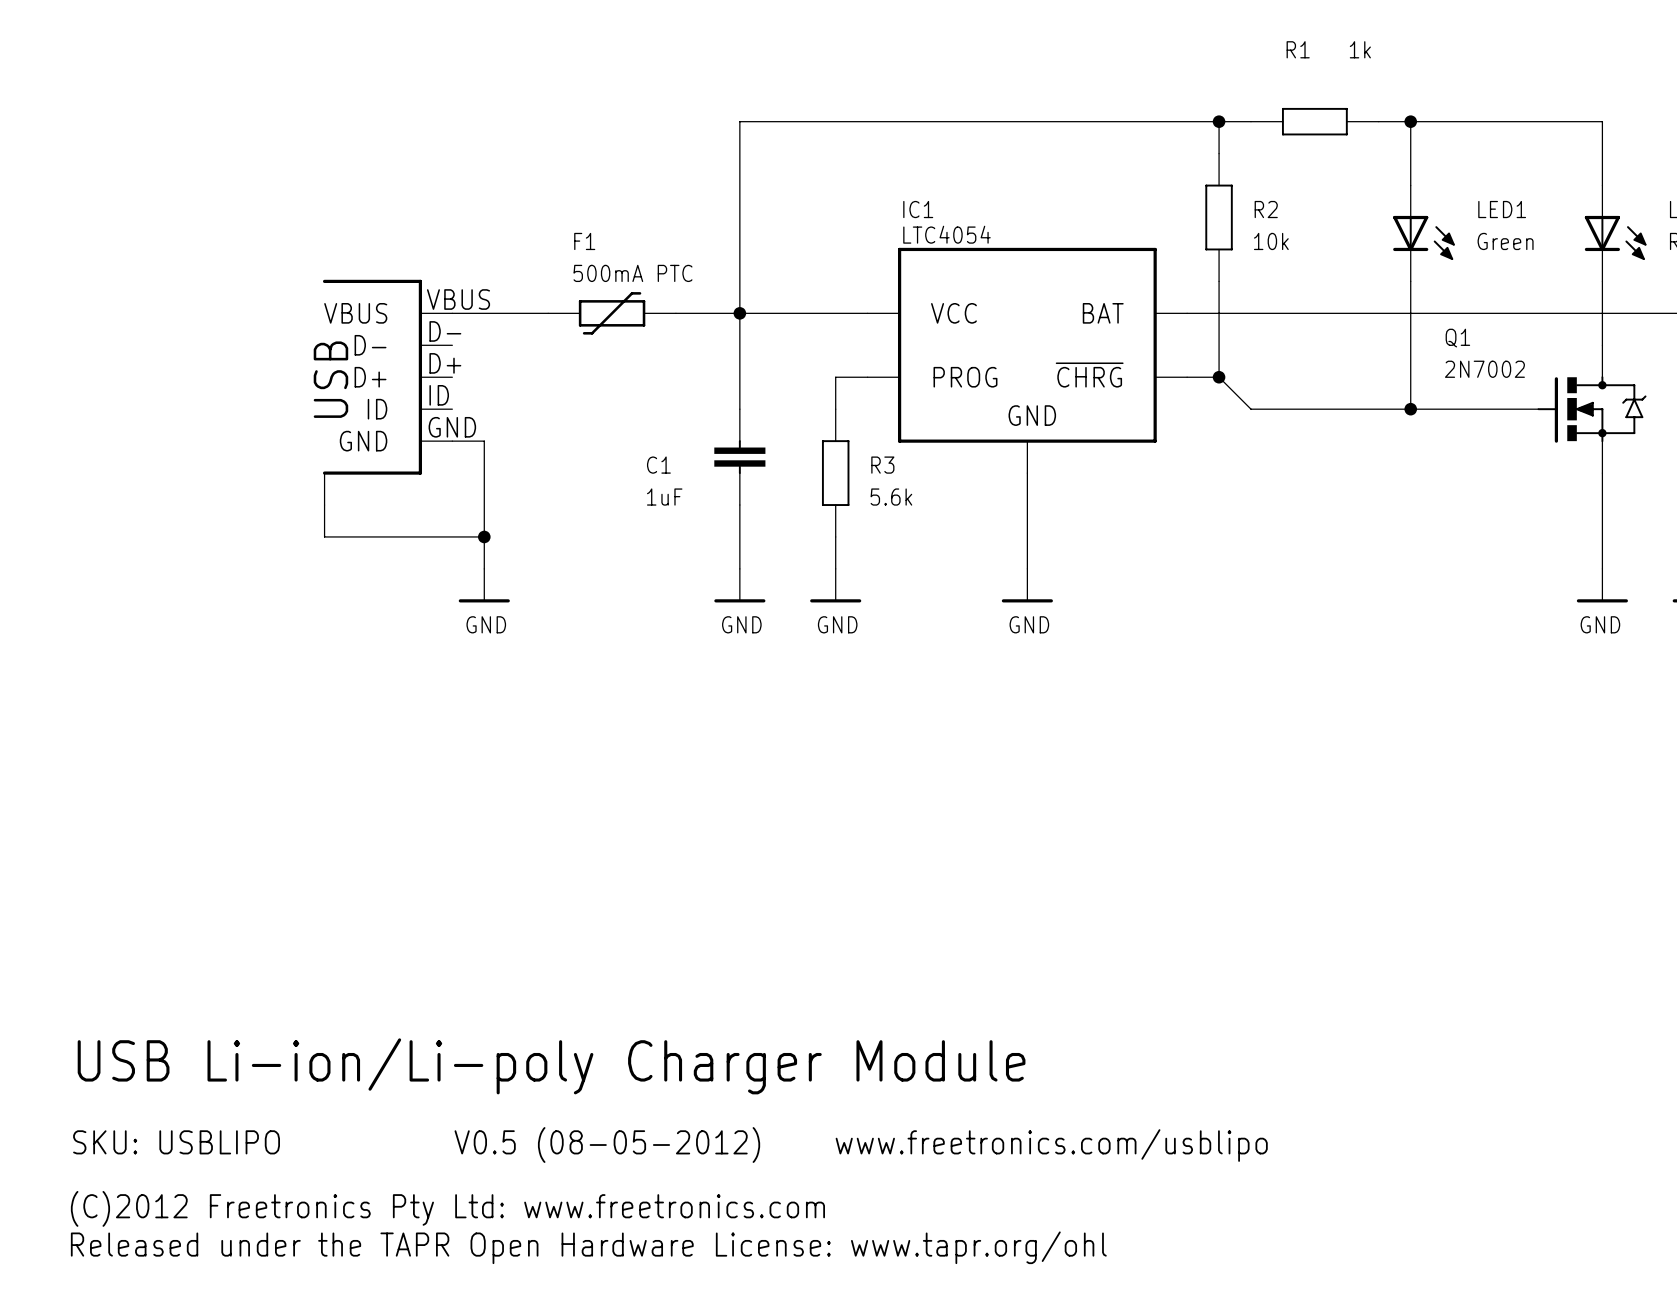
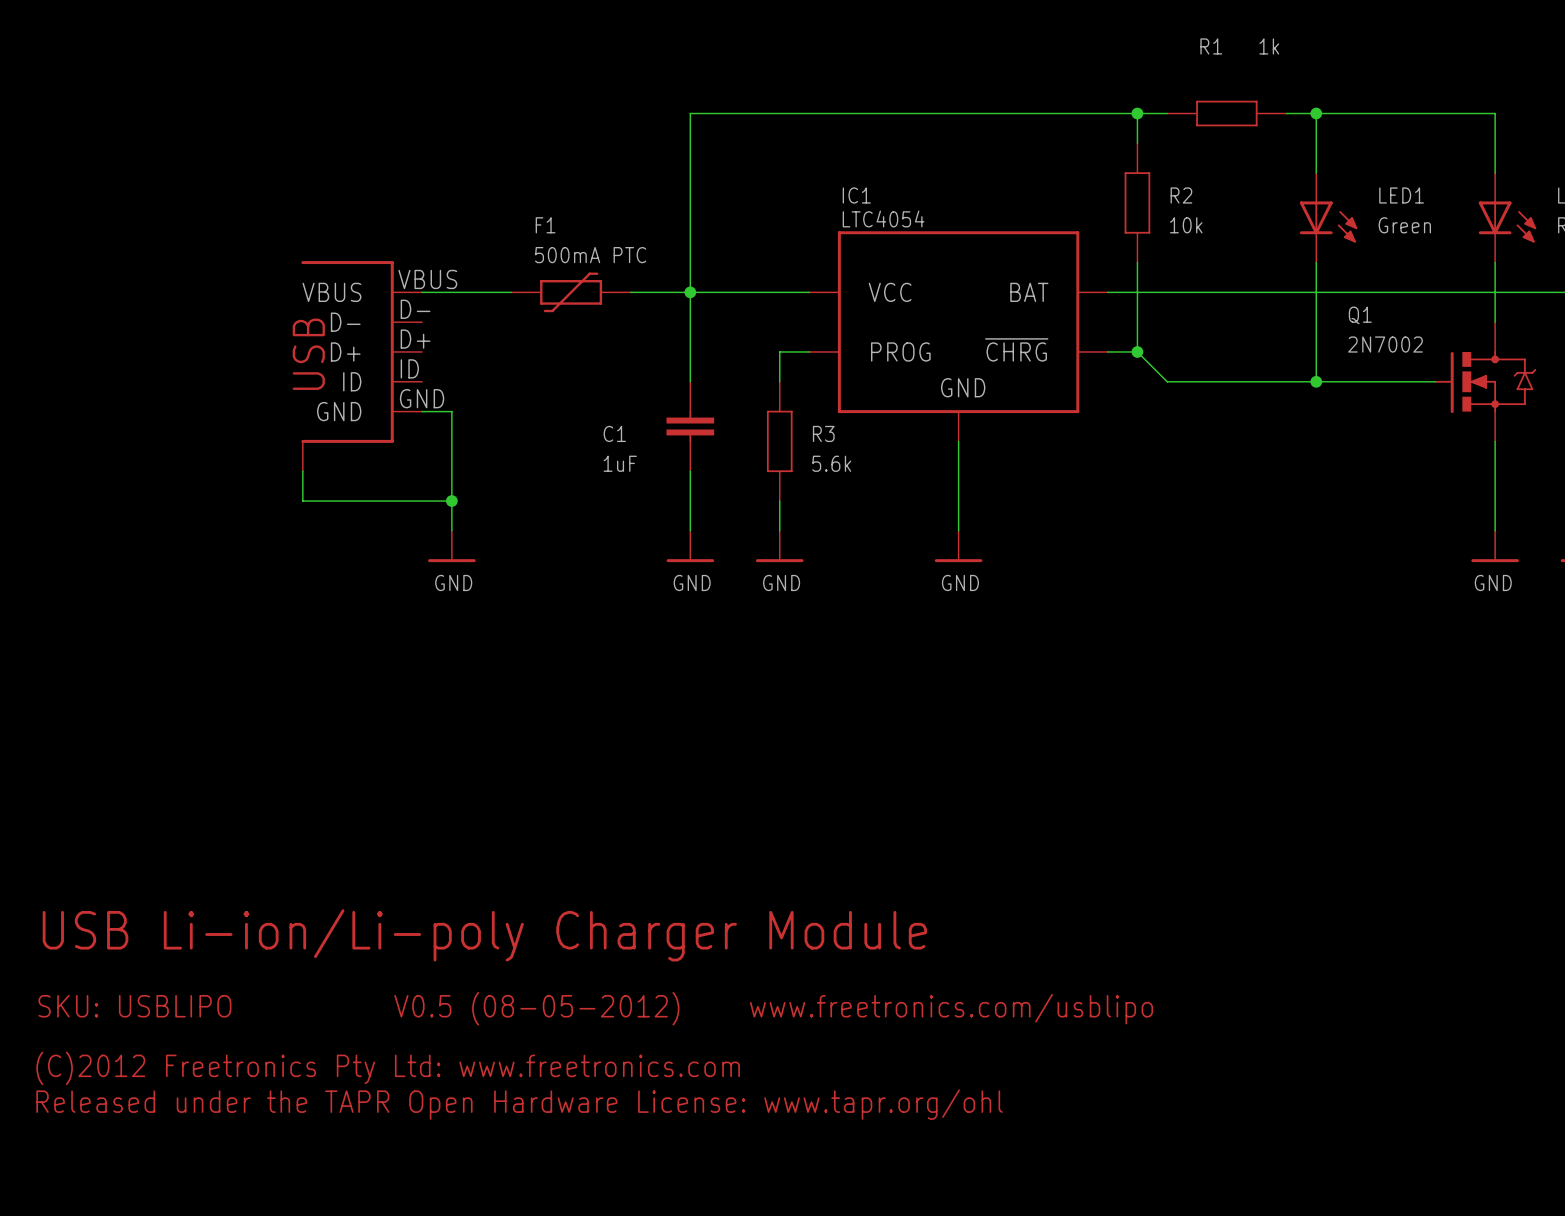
text position: USB Li-ion/Li-poly Charger Module (551, 1066) -> USB Li-ion/Li-poly Charger Module (484, 935)
text position: SKU: USBLIPO (176, 1142) -> SKU: USBLIPO (134, 1006)
text position: V0.5 (08-05-2012) (607, 1145) -> V0.5 (08-05-2012) (536, 1008)
text position: www.freetronics.com/usblipo (1051, 1145) -> www.freetronics.com/usblipo (951, 1009)
text position: (C)2012 Freetronics Pty Ltd: www.freetronics.com (447, 1208) -> (C)2012 Freetronics Pty Ltd: www.freetronics.com (388, 1068)
text position: Released under the TAPR Open Hardware License: www.tapr.org/ohl (588, 1247) -> Released under the TAPR Open Hardware License: www.tapr.org/ohl (519, 1104)

